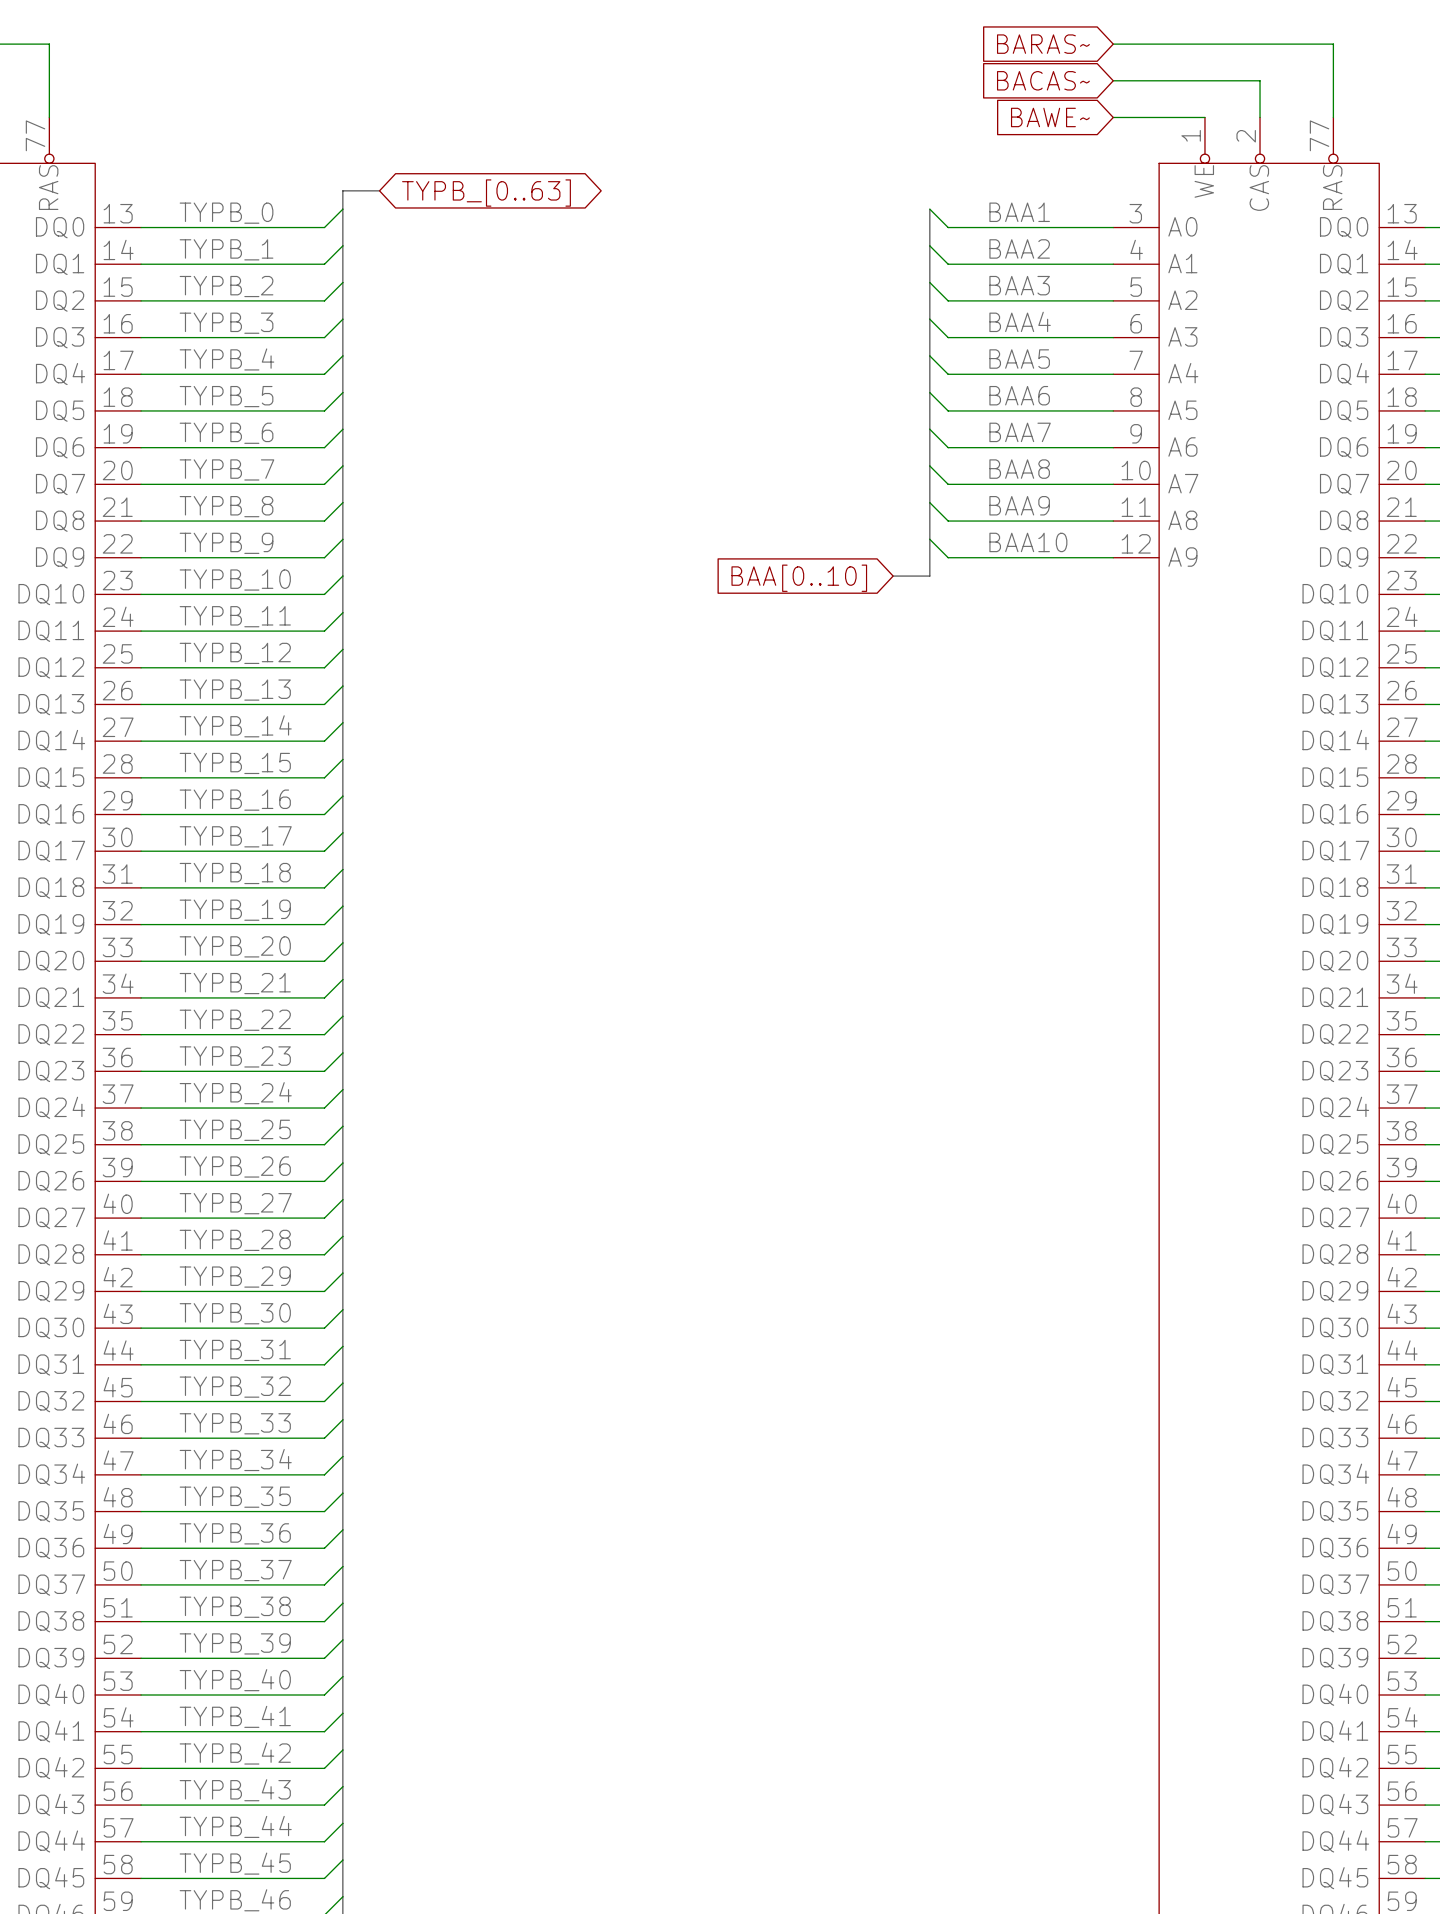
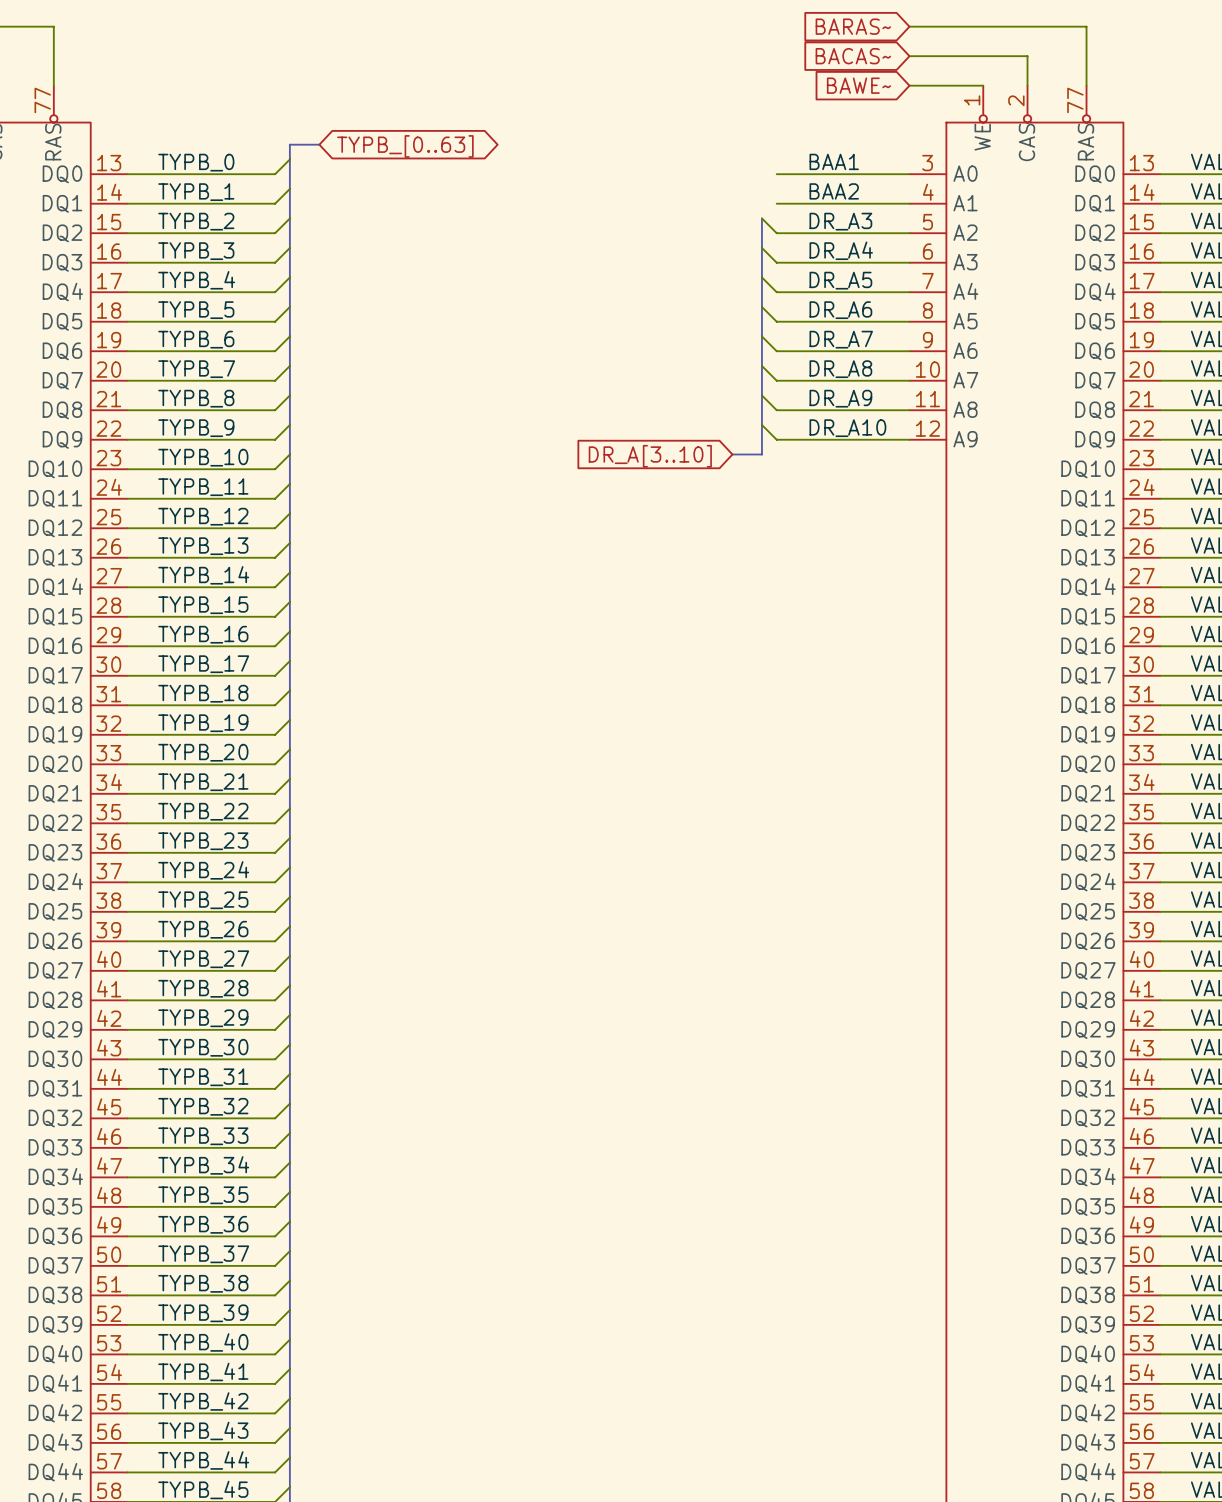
wire: (929, 209) (948, 227) -> none
bus: (929, 209) (929, 282) -> none
wire: (929, 245) (948, 264) -> none
label: BAA3 (1019, 285) -> DR_A3 (840, 221)
label: BAA4 (1020, 321) -> DR_A4 (841, 250)
label: BAA5 (1019, 359) -> DR_A5 (840, 280)
label: BAA6 (1019, 395) -> DR_A6 (840, 310)
label: BAA7 (1020, 432) -> DR_A7 (841, 339)
label: BAA8 (1019, 469) -> DR_A8 (840, 369)
label: BAA9 (1019, 505) -> DR_A9 (840, 398)
label: BAA10 (1028, 542) -> DR_A10 (847, 428)
global label: BAA[0..10] (799, 578) -> DR_A[3..10] (650, 456)

